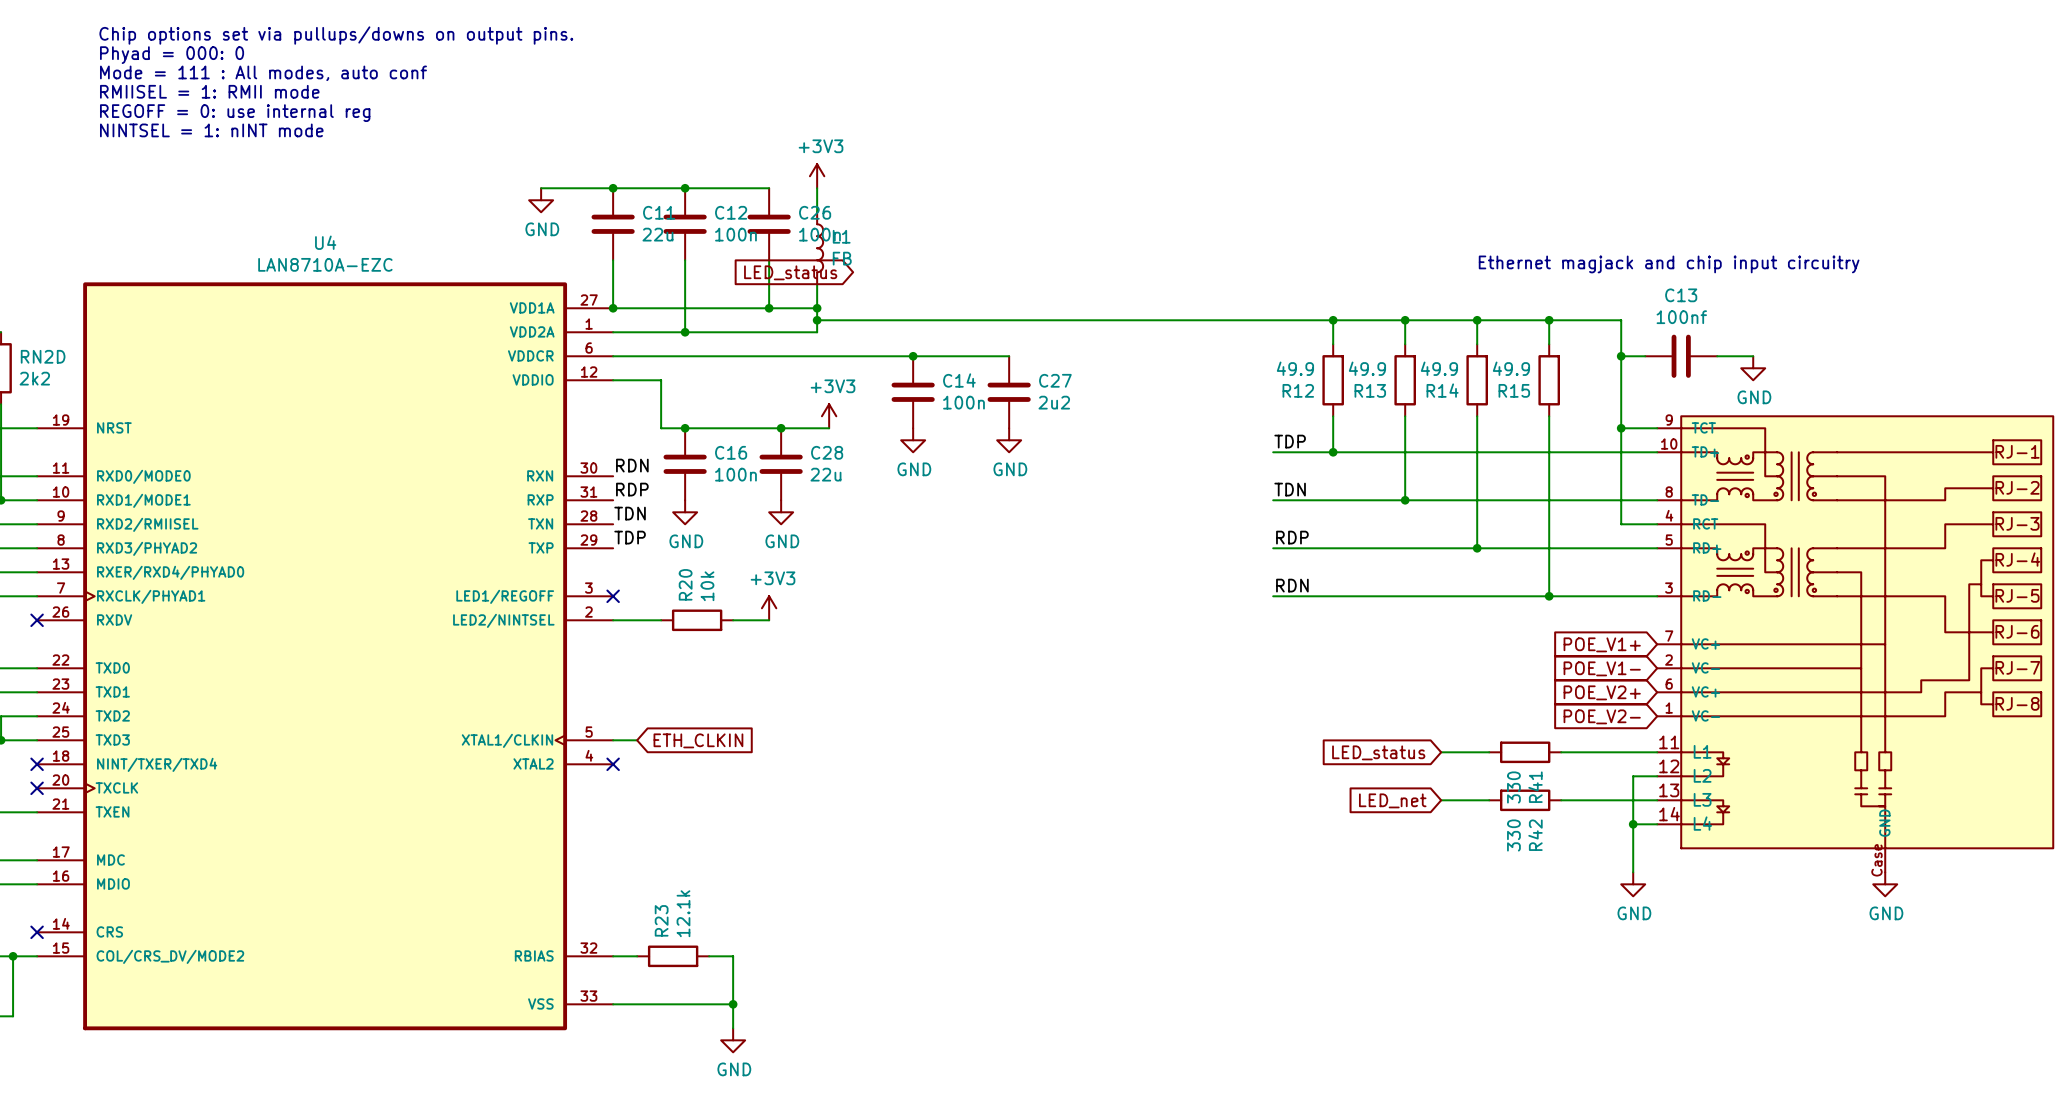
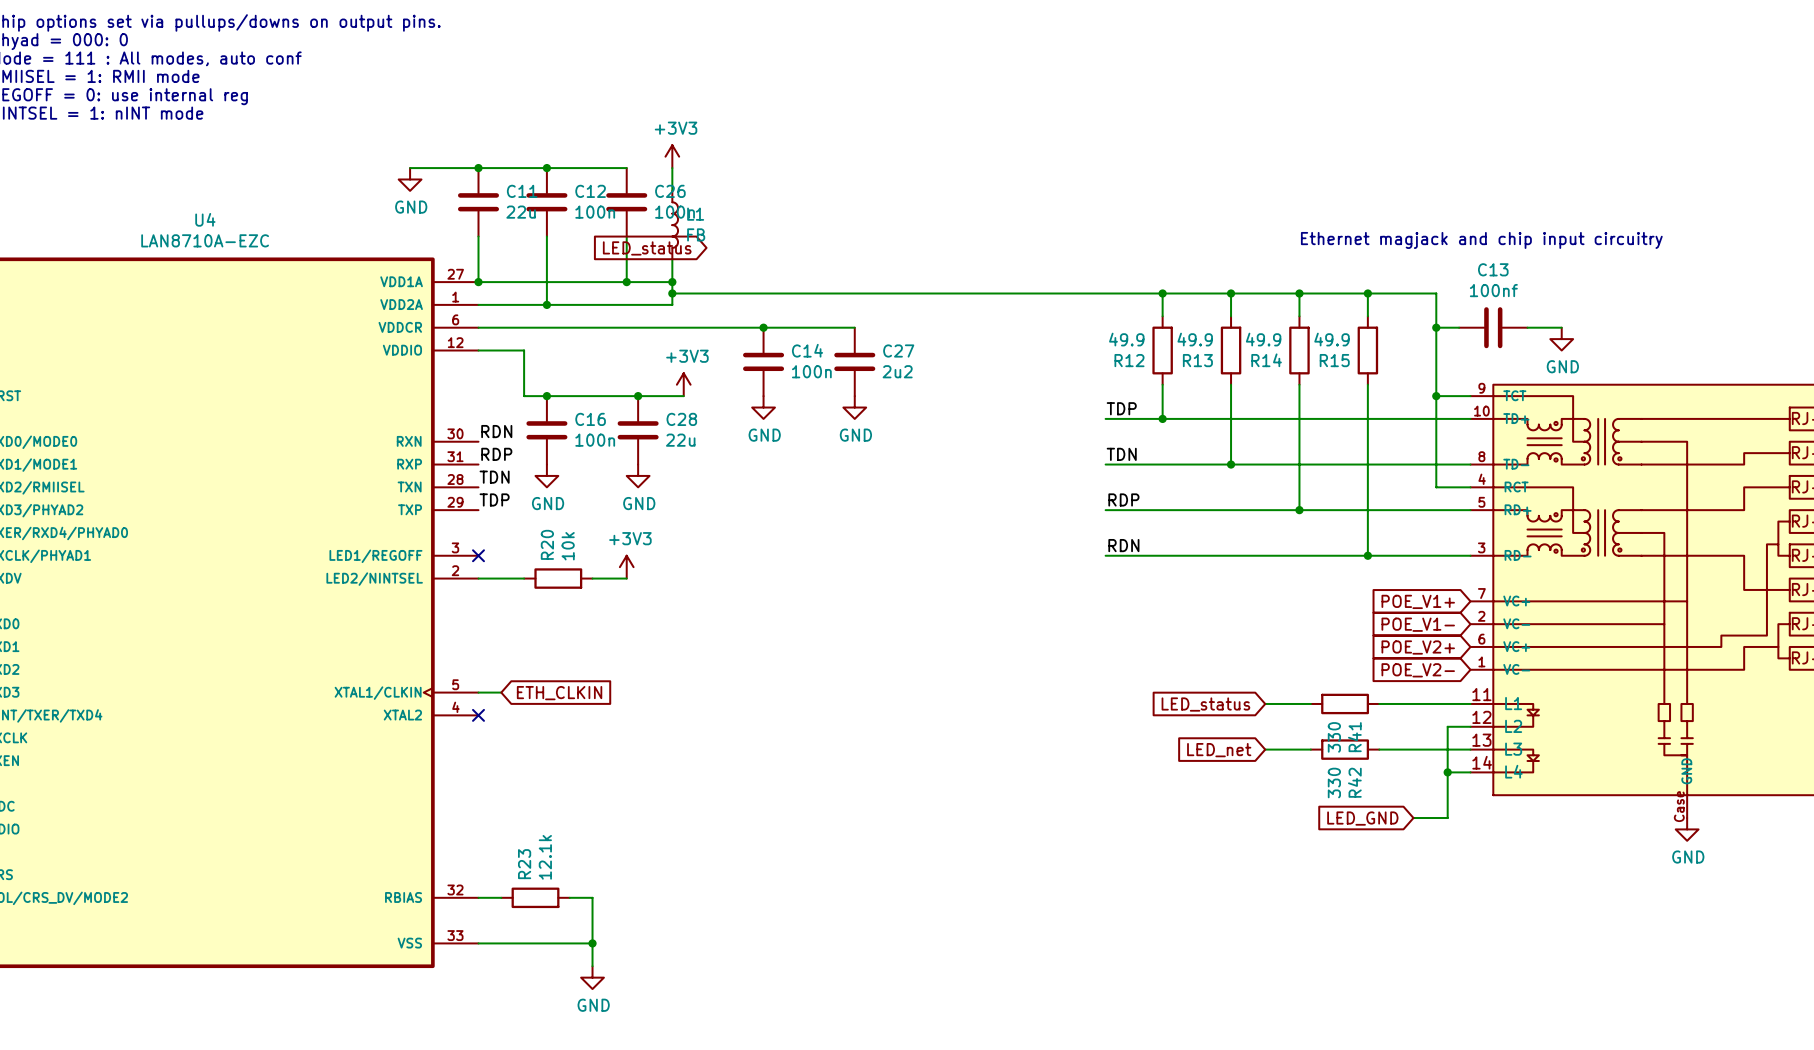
global label: none -> LED_GND (1362, 818)
wire: none -> (1413, 818) (1447, 818)
power symbol: GND (1633, 884) -> none

